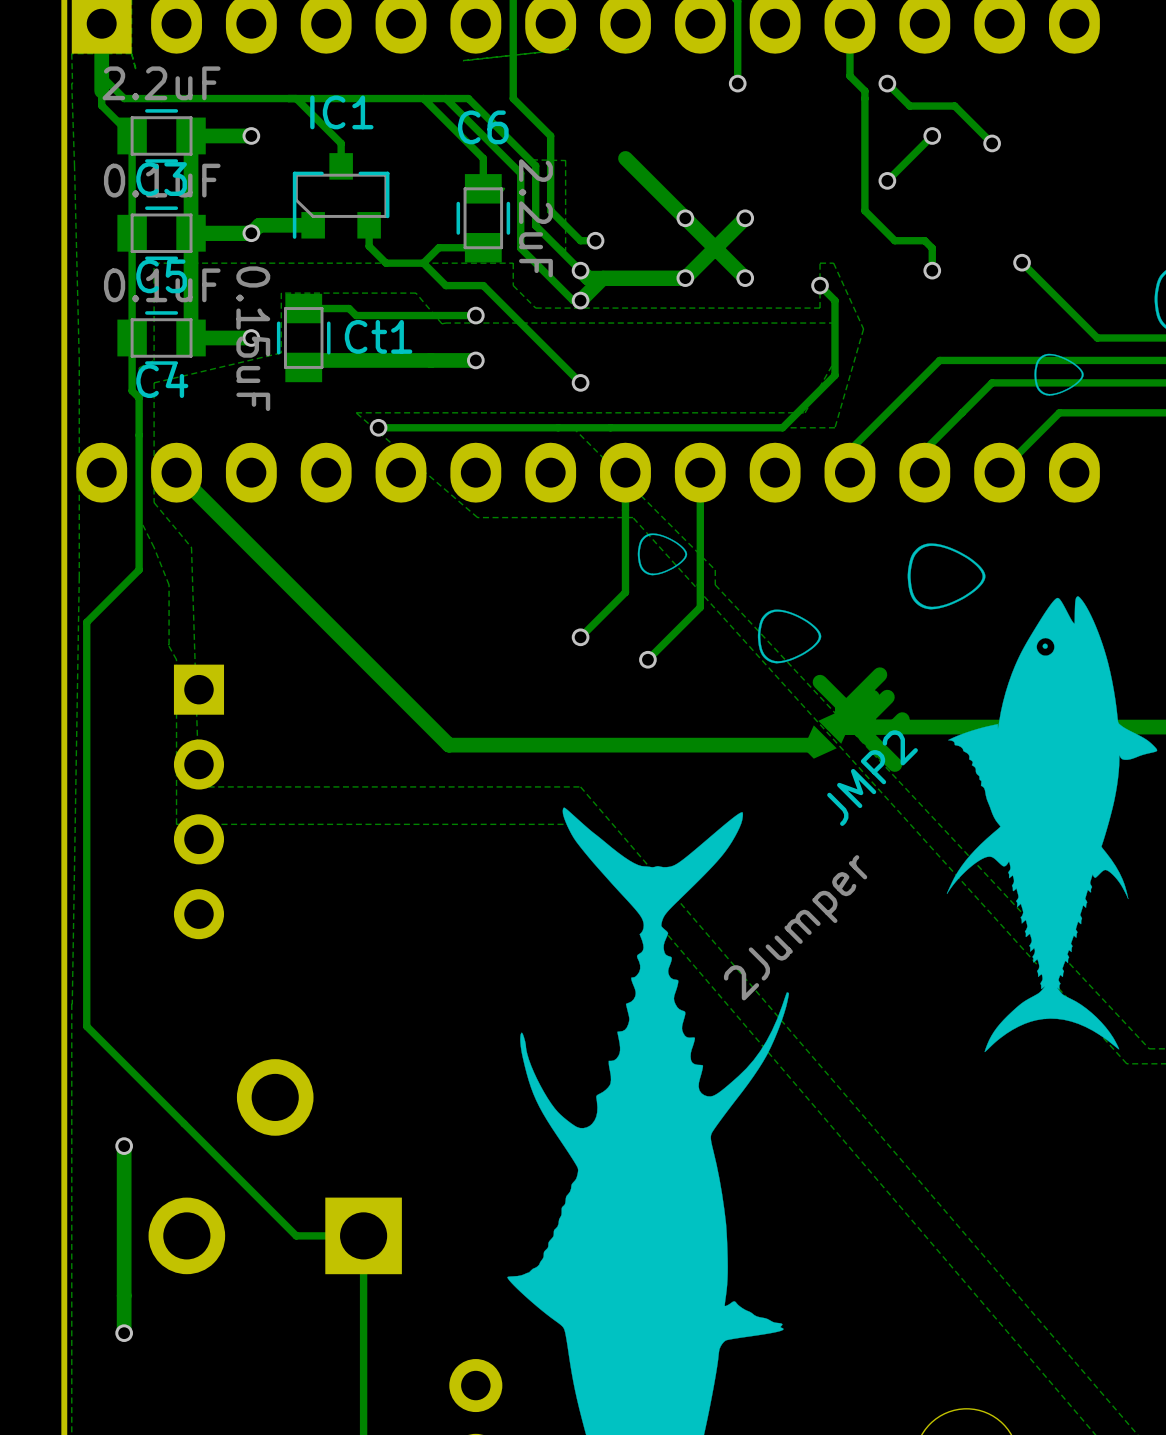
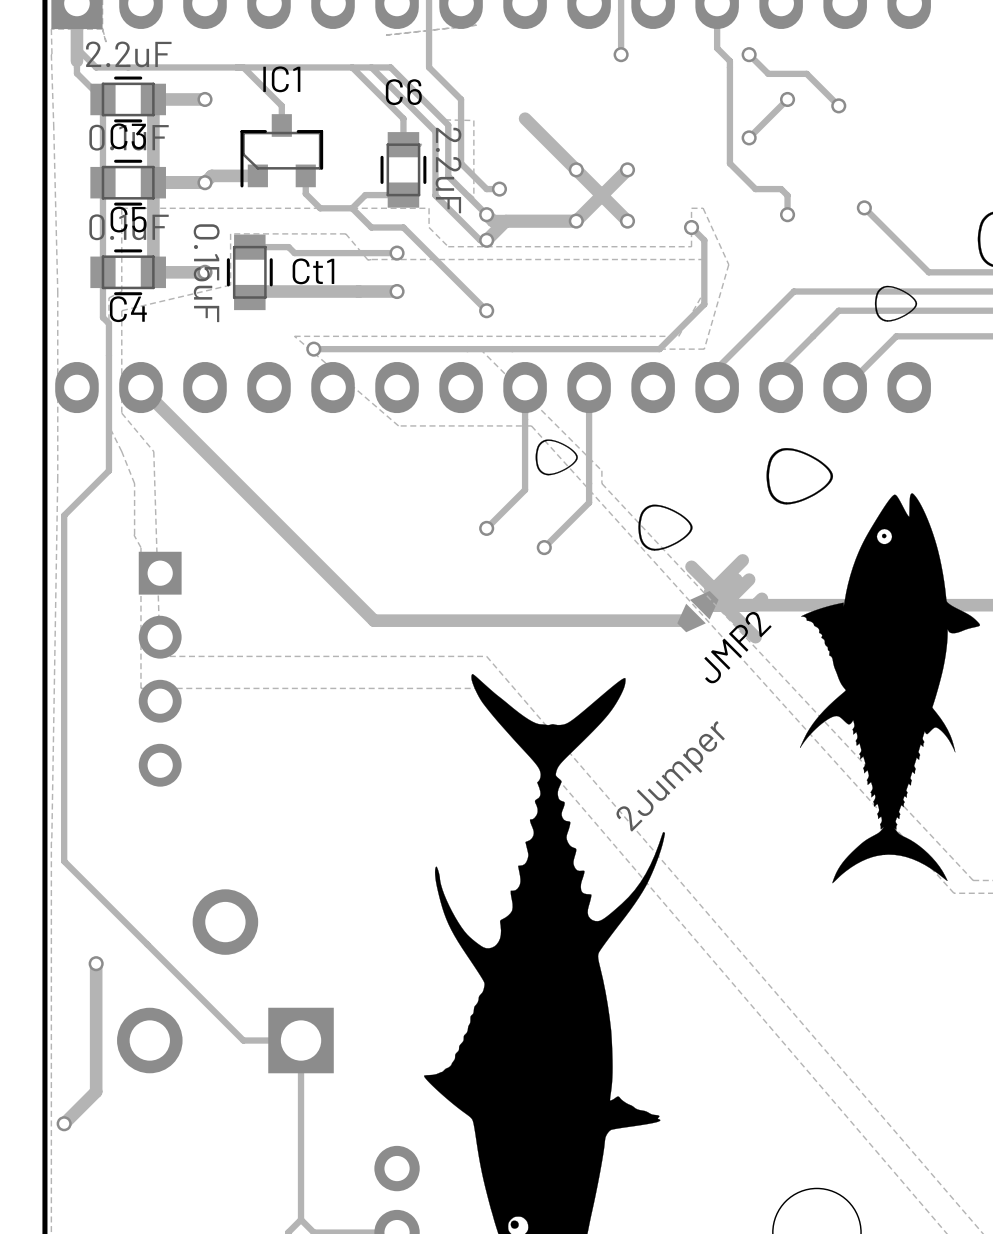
track: (124, 1295) (124, 1333) -> (96, 1091) (64, 1123)
via position: (124, 1333) -> (64, 1123)

